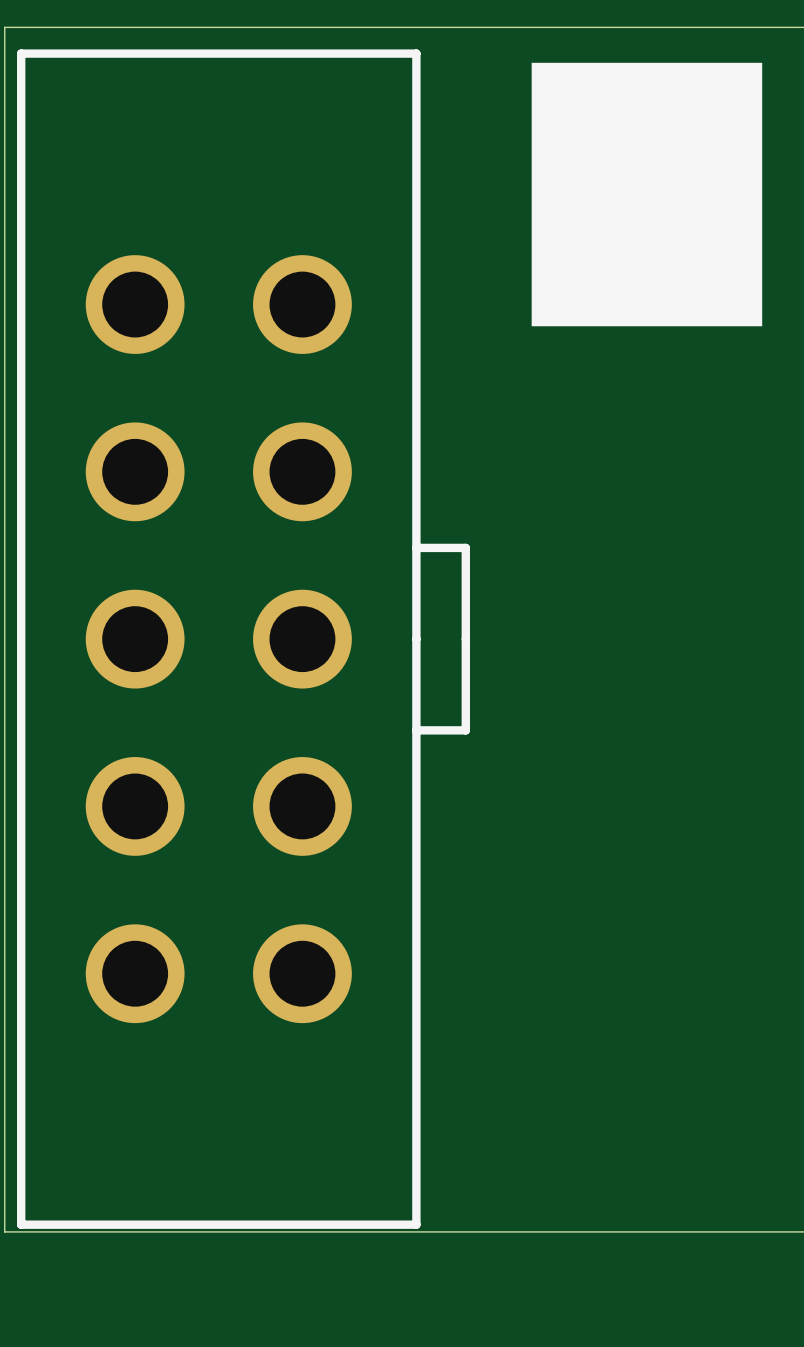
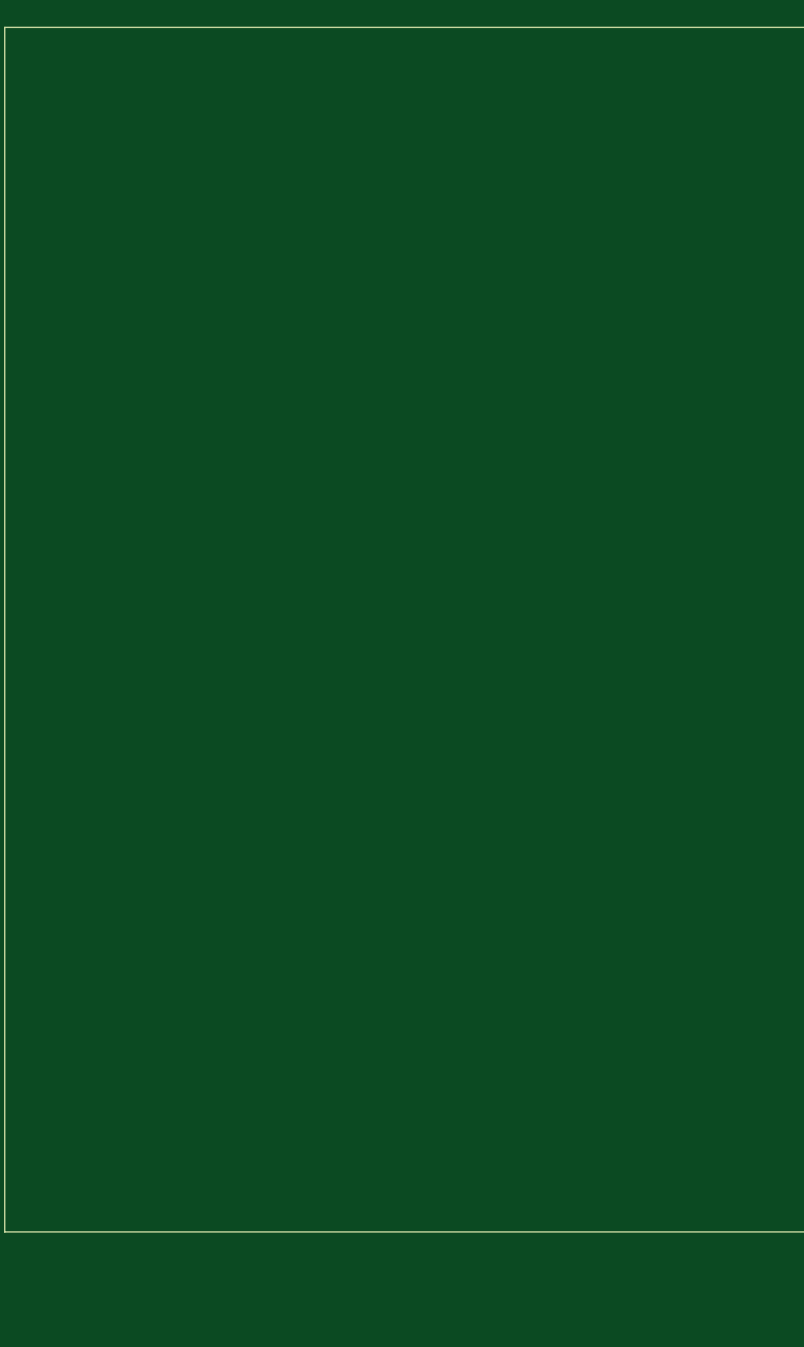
drawing: [531, 62, 763, 327] -> none
part: (243, 639) -> none

